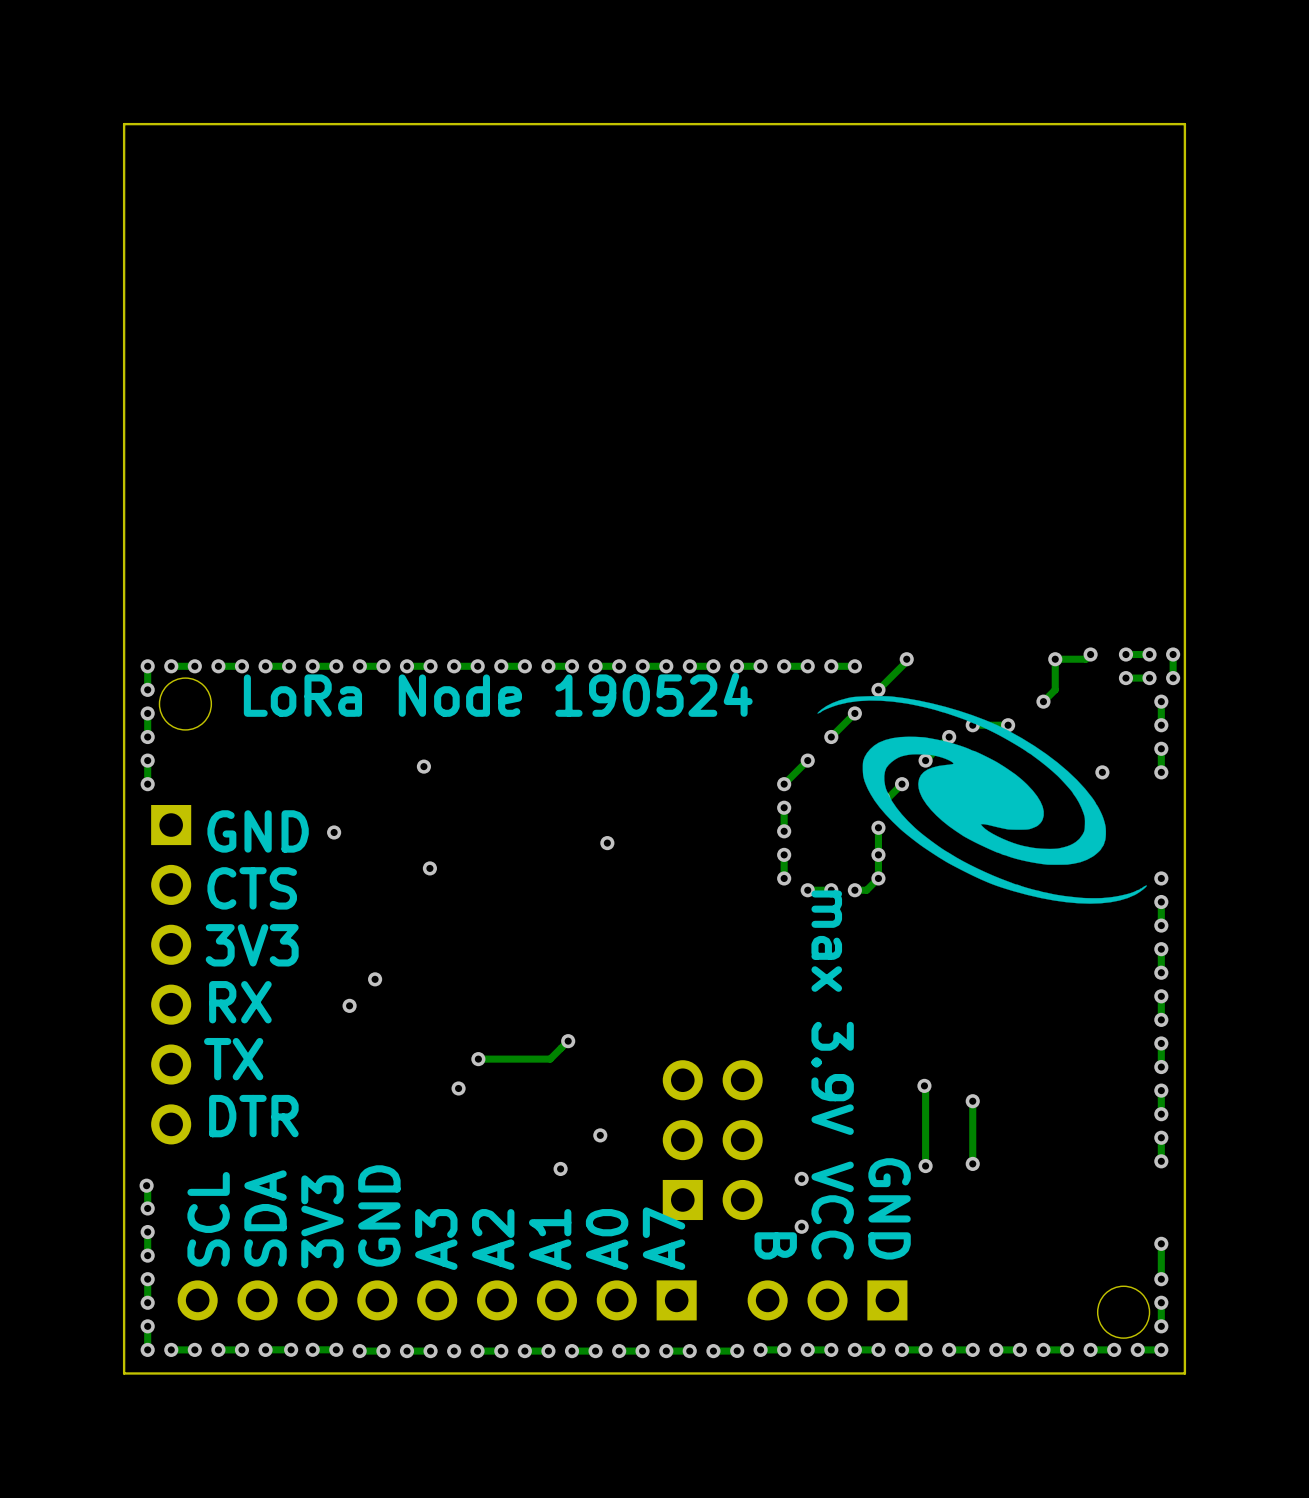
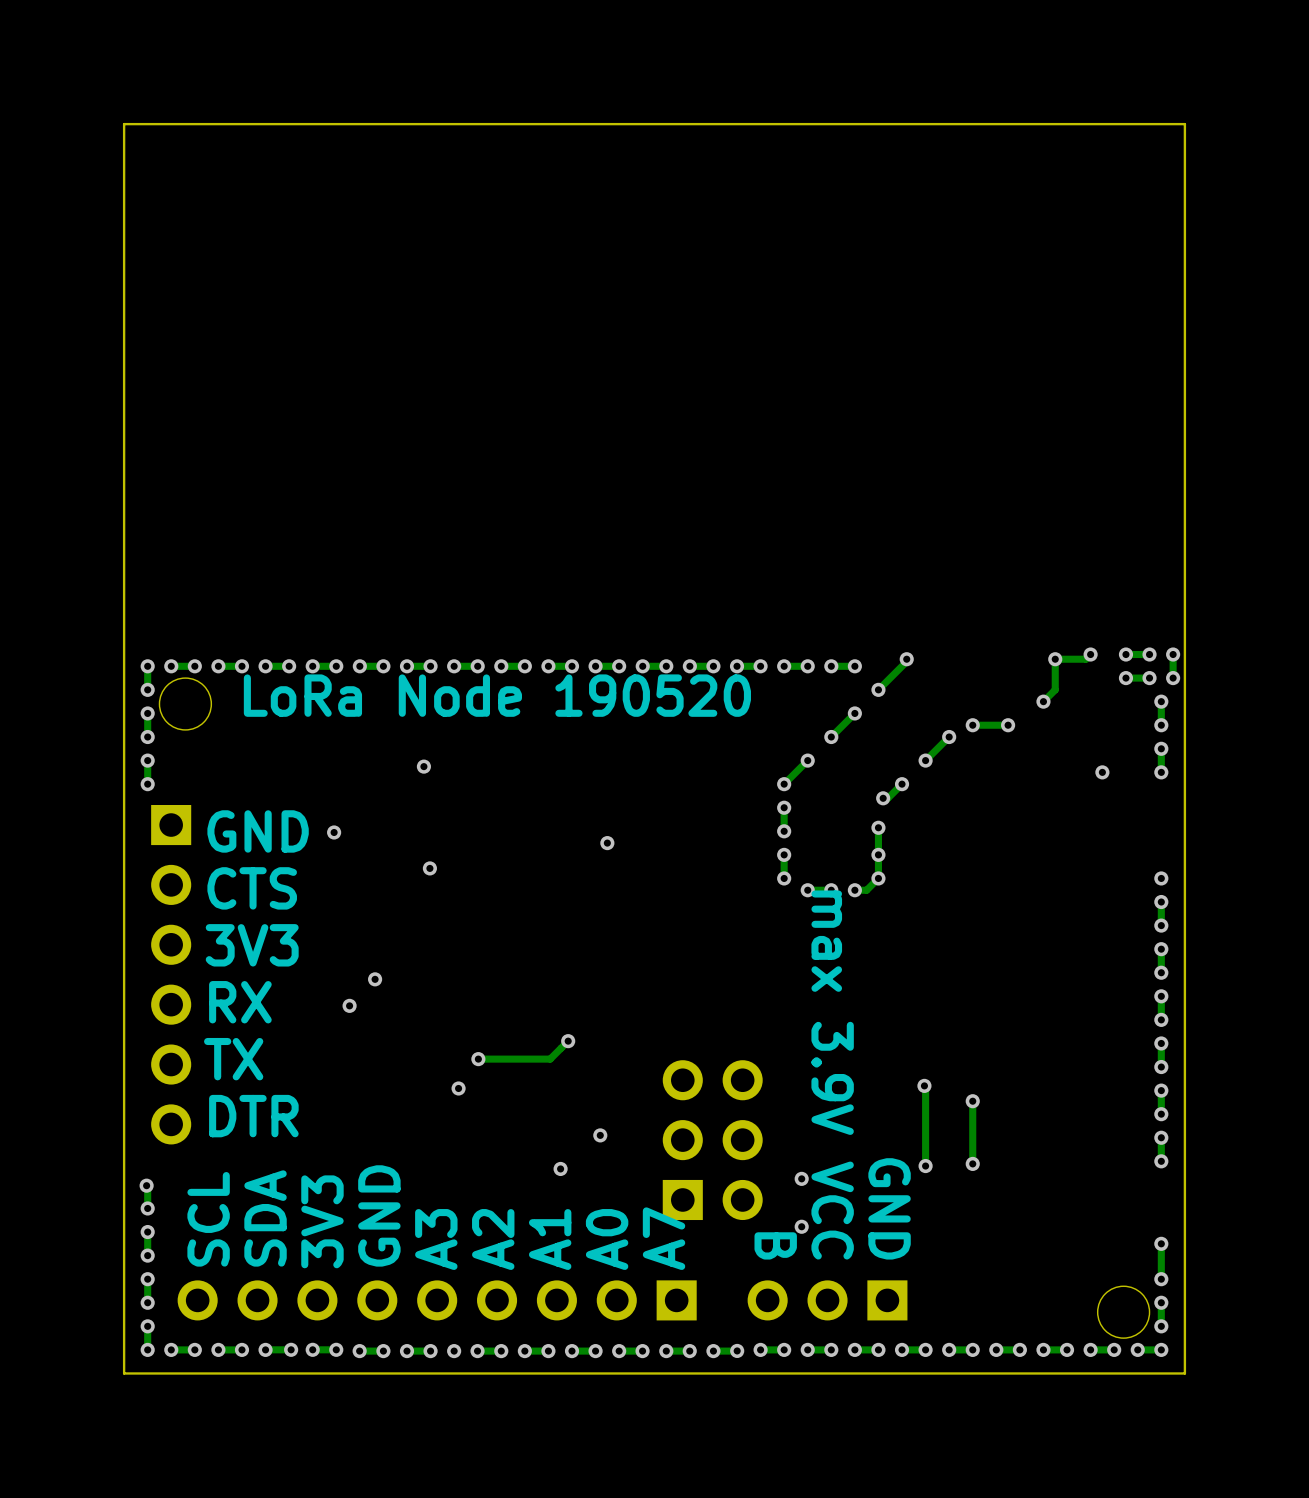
text: LoRa Node 190524 (498, 694) -> LoRa Node 190520 (497, 695)
drawing: [817, 696, 1147, 904] -> none

